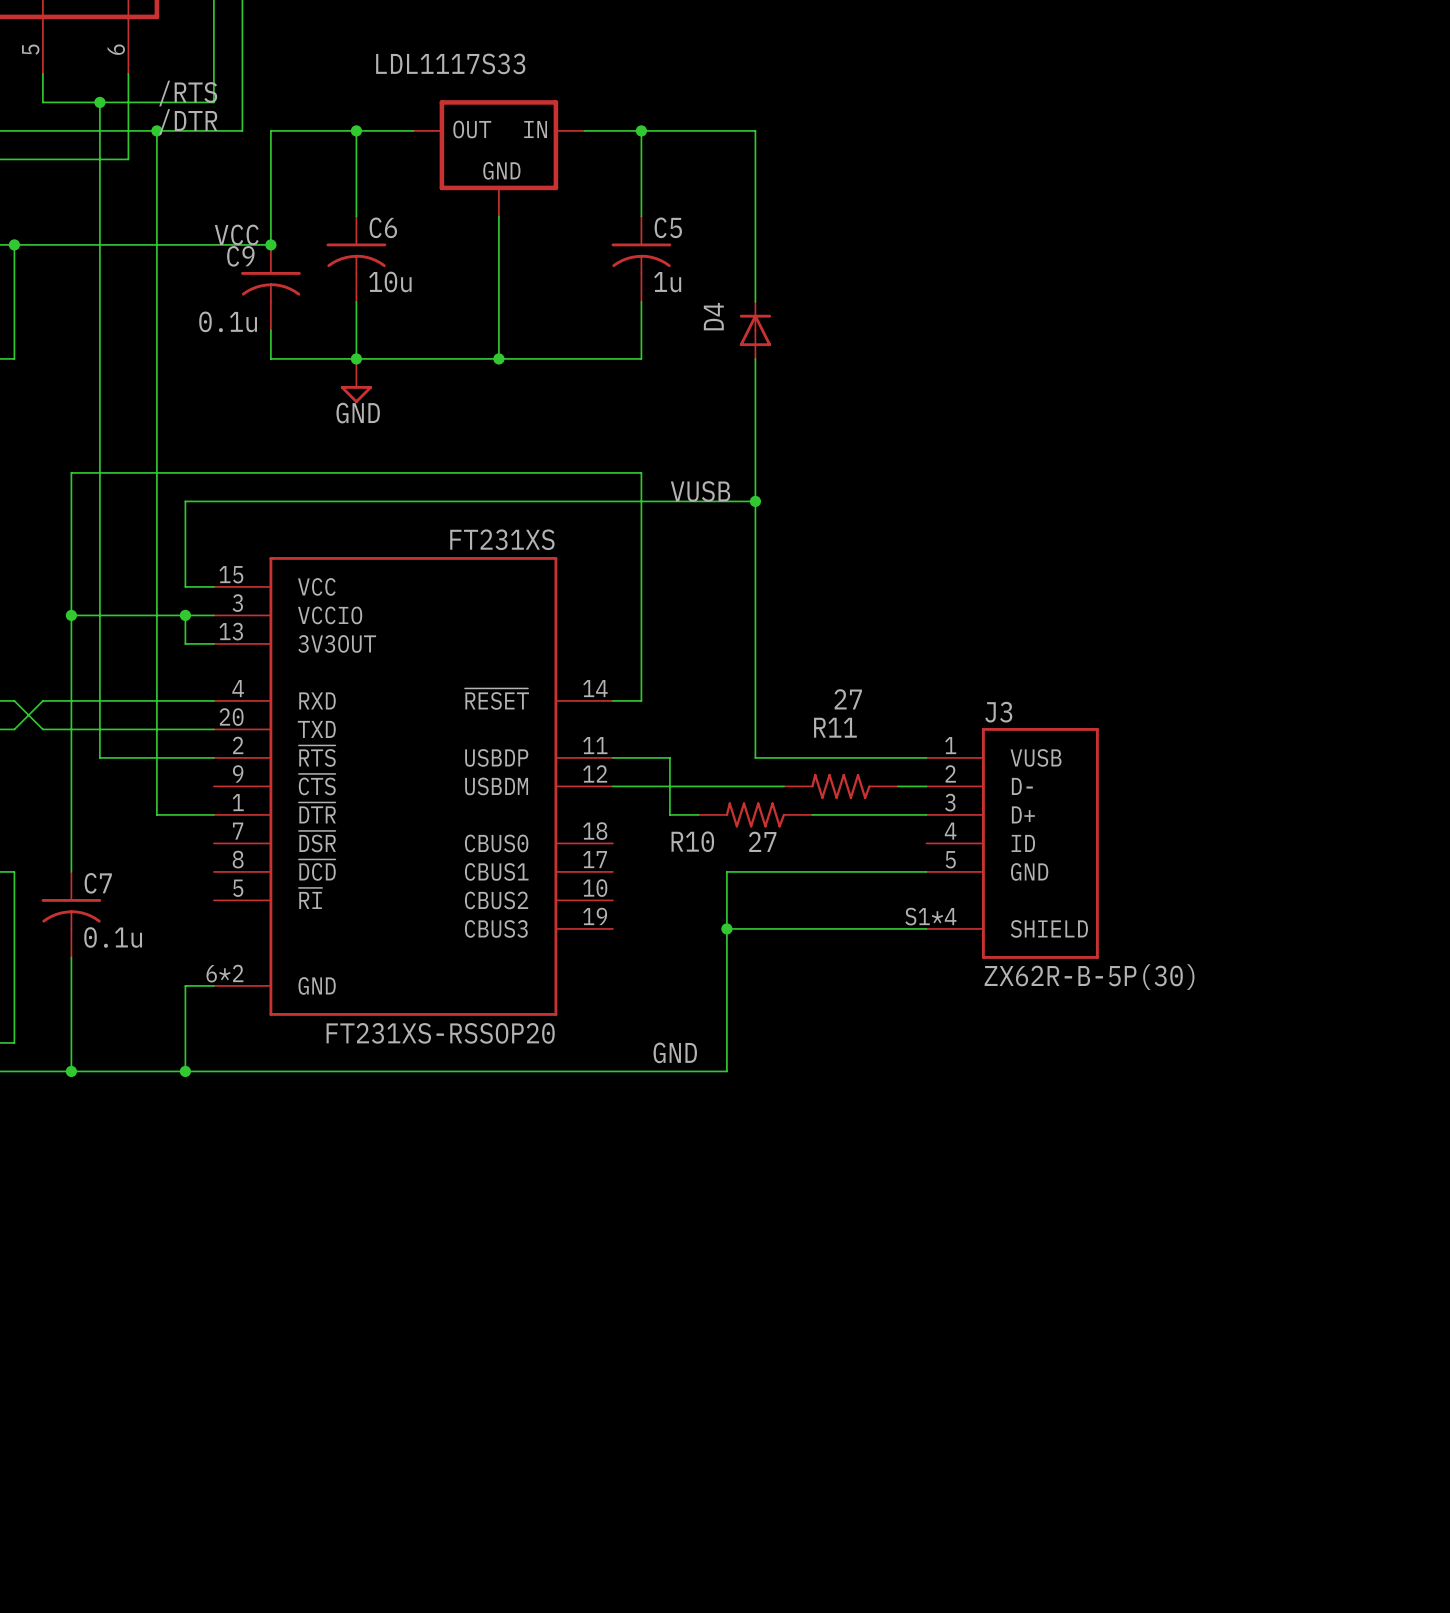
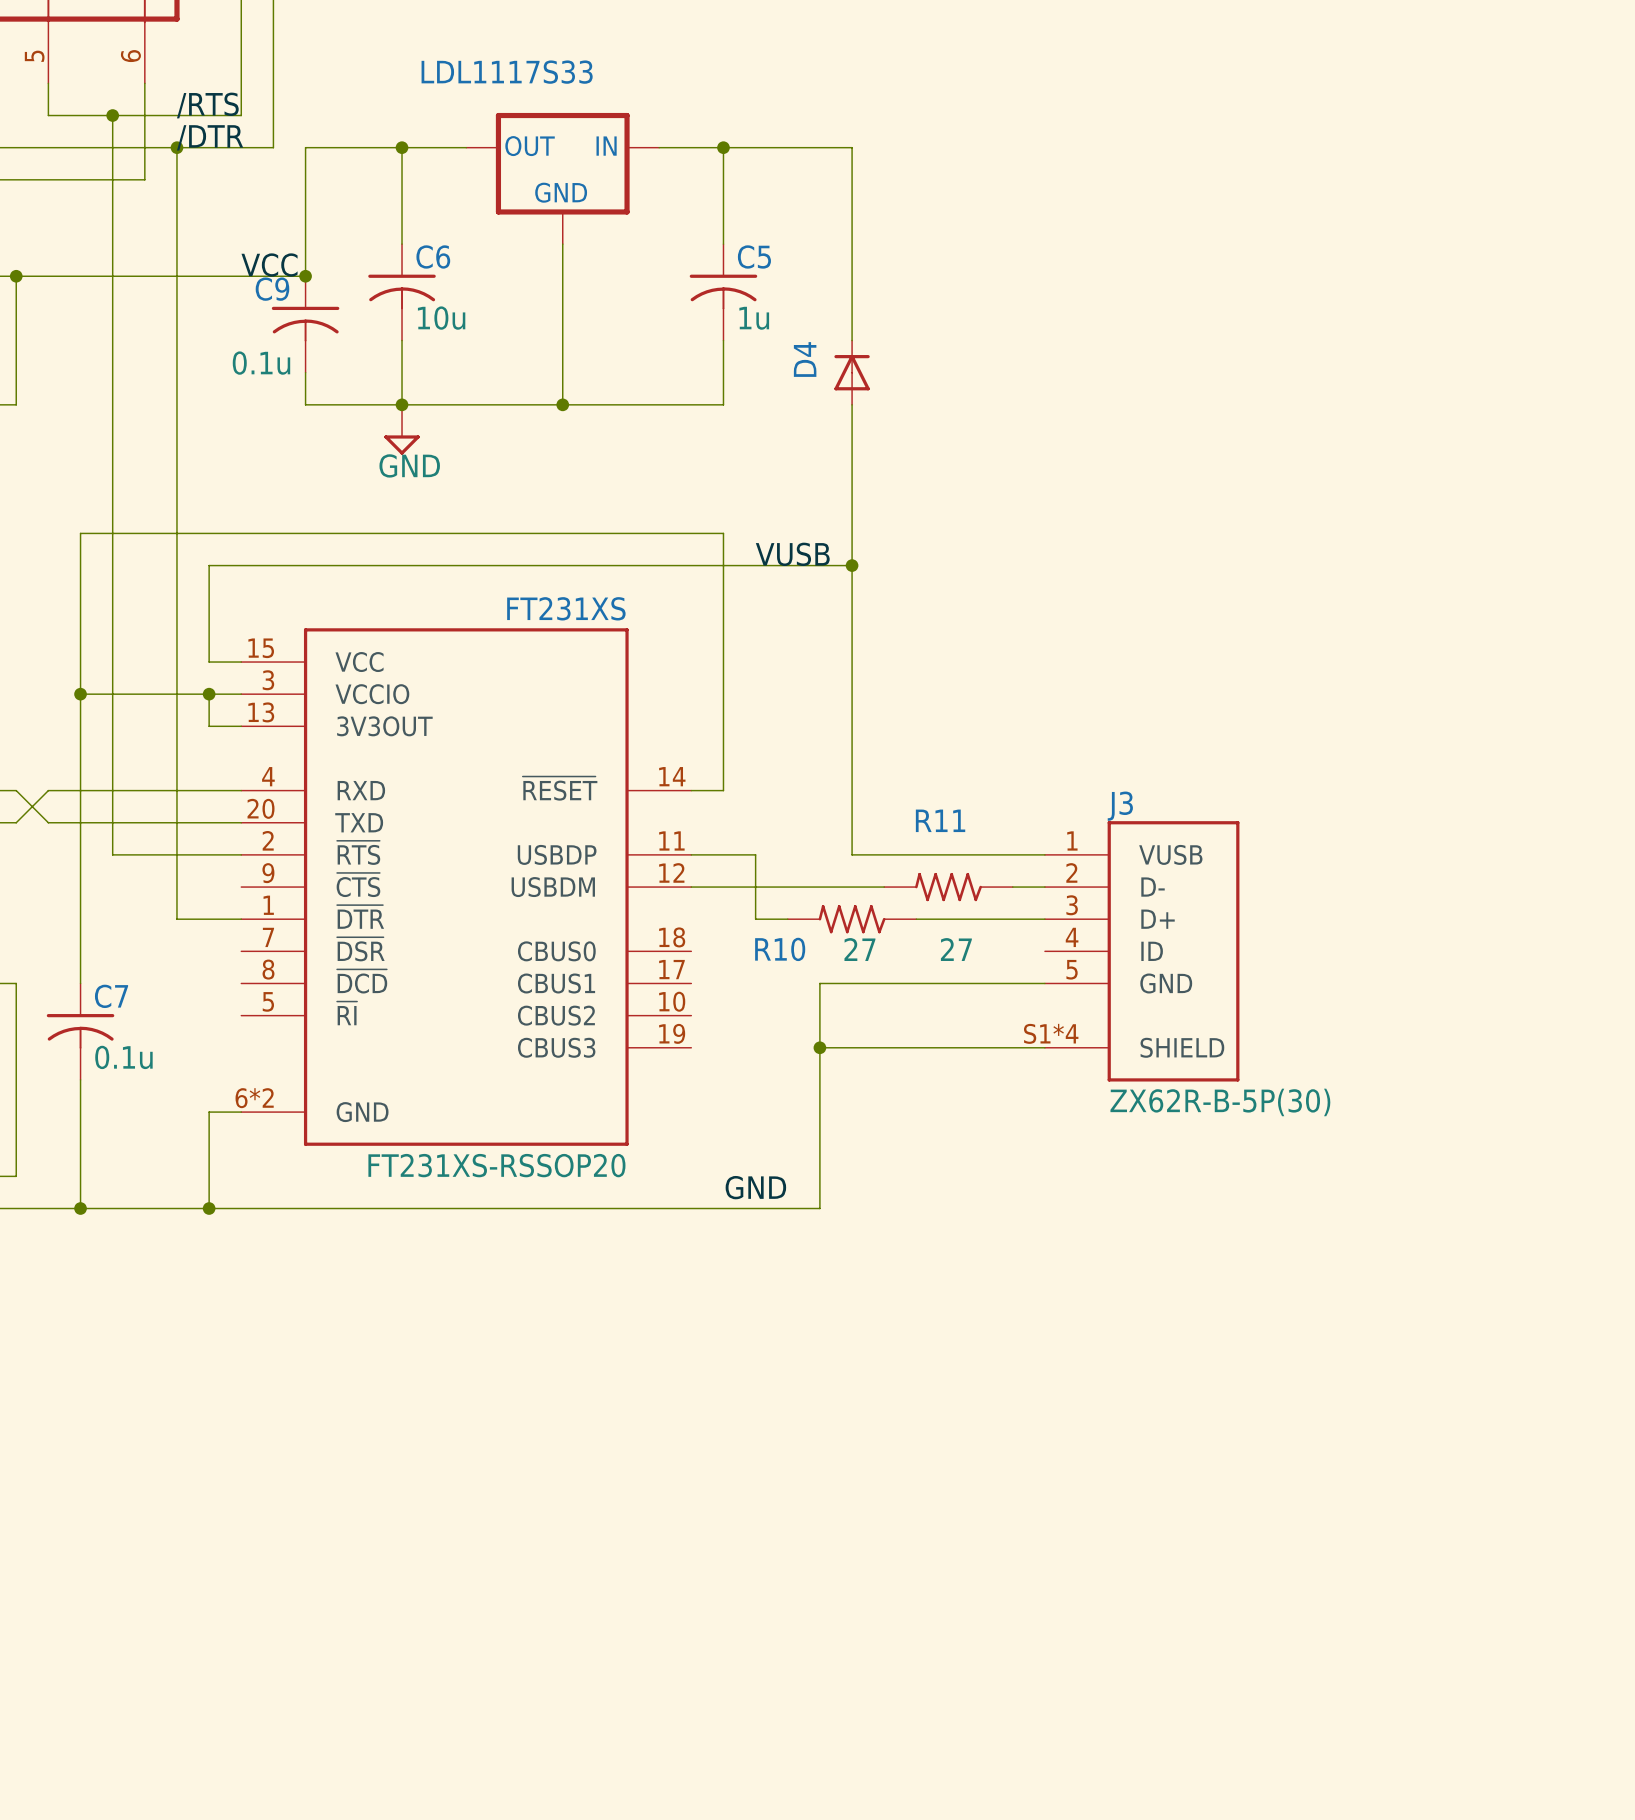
R11 value position: 27 (848, 699) -> 27 (956, 949)

